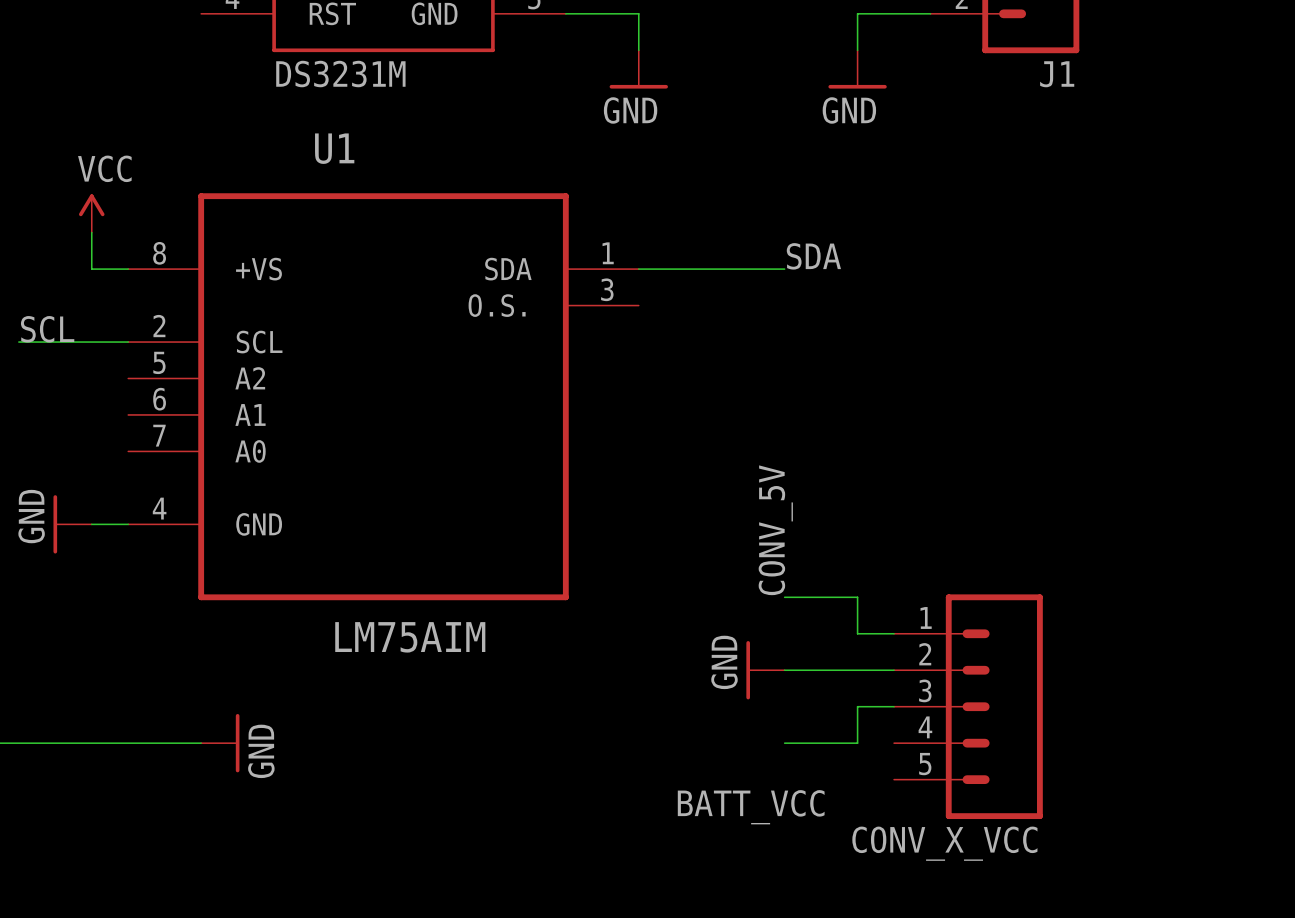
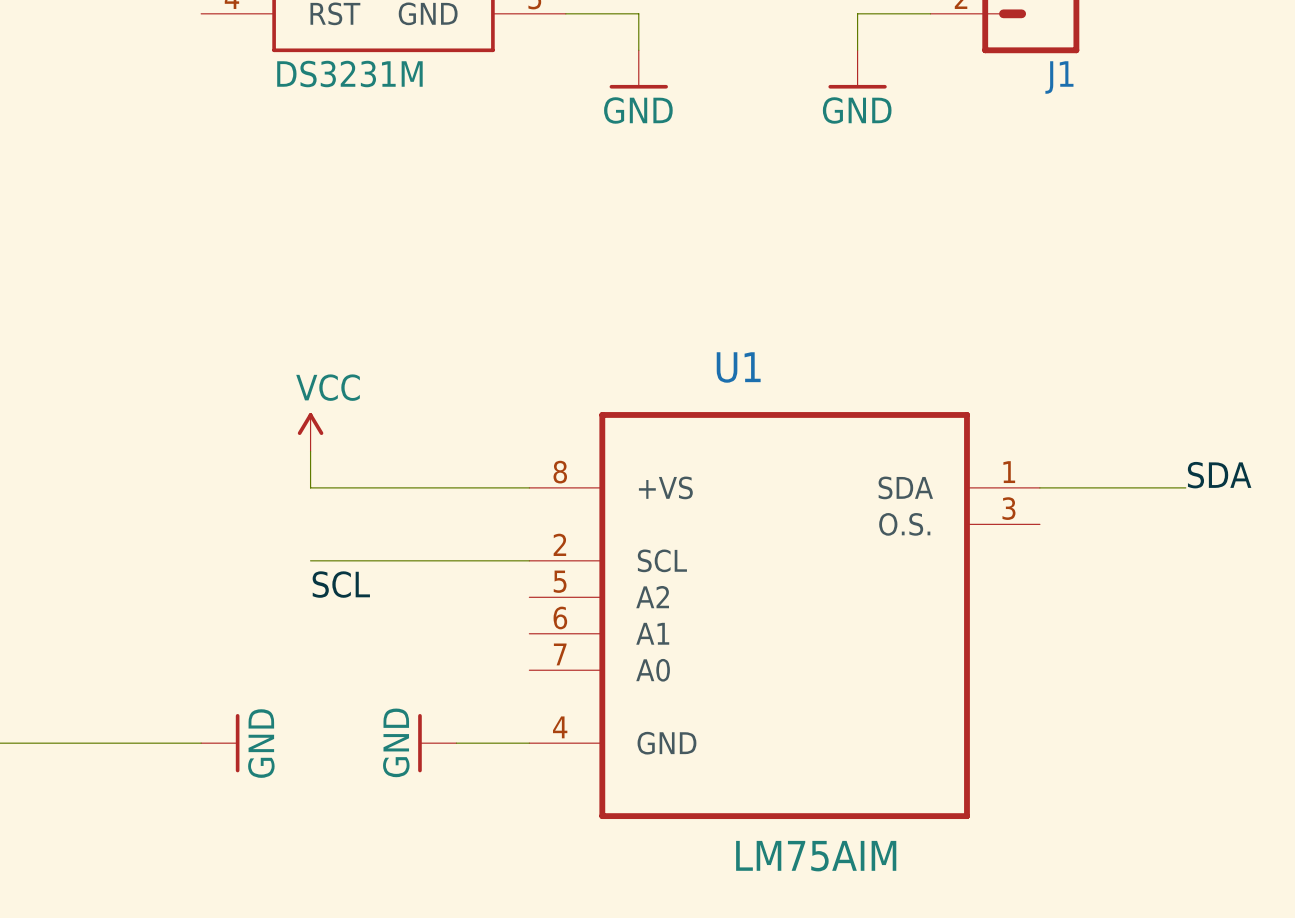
power symbol position: VCC (91, 213) -> VCC (310, 432)
wire: (91, 232) (91, 269) (128, 269) -> none
label: SDA (813, 256) -> none
wire: (638, 269) (784, 269) -> none
label: SCL (47, 329) -> none
wire: (18, 342) (128, 342) -> none
U1 position: (383, 396) -> (784, 615)
wire: none -> (310, 451) (310, 487) (529, 487)
label: none -> SDA (1219, 475)
wire: none -> (1039, 487) (1185, 487)
power symbol: GND (72, 524) -> none
wire: (91, 524) (128, 524) -> none
label: CONV_5V (775, 530) -> none
wire: none -> (310, 560) (529, 560)
label: none -> SCL (341, 584)
wire: (784, 597) (857, 597) (857, 633) (894, 633) -> none
power symbol: GND (765, 670) -> none
wire: (784, 670) (894, 670) -> none
wire: (894, 706) (857, 706) (857, 743) (784, 743) -> none
CONV_X_VCC: (968, 706) -> none
power symbol: none -> GND (437, 743)
wire: none -> (456, 743) (529, 743)
label: BATT_VCC (751, 807) -> none

